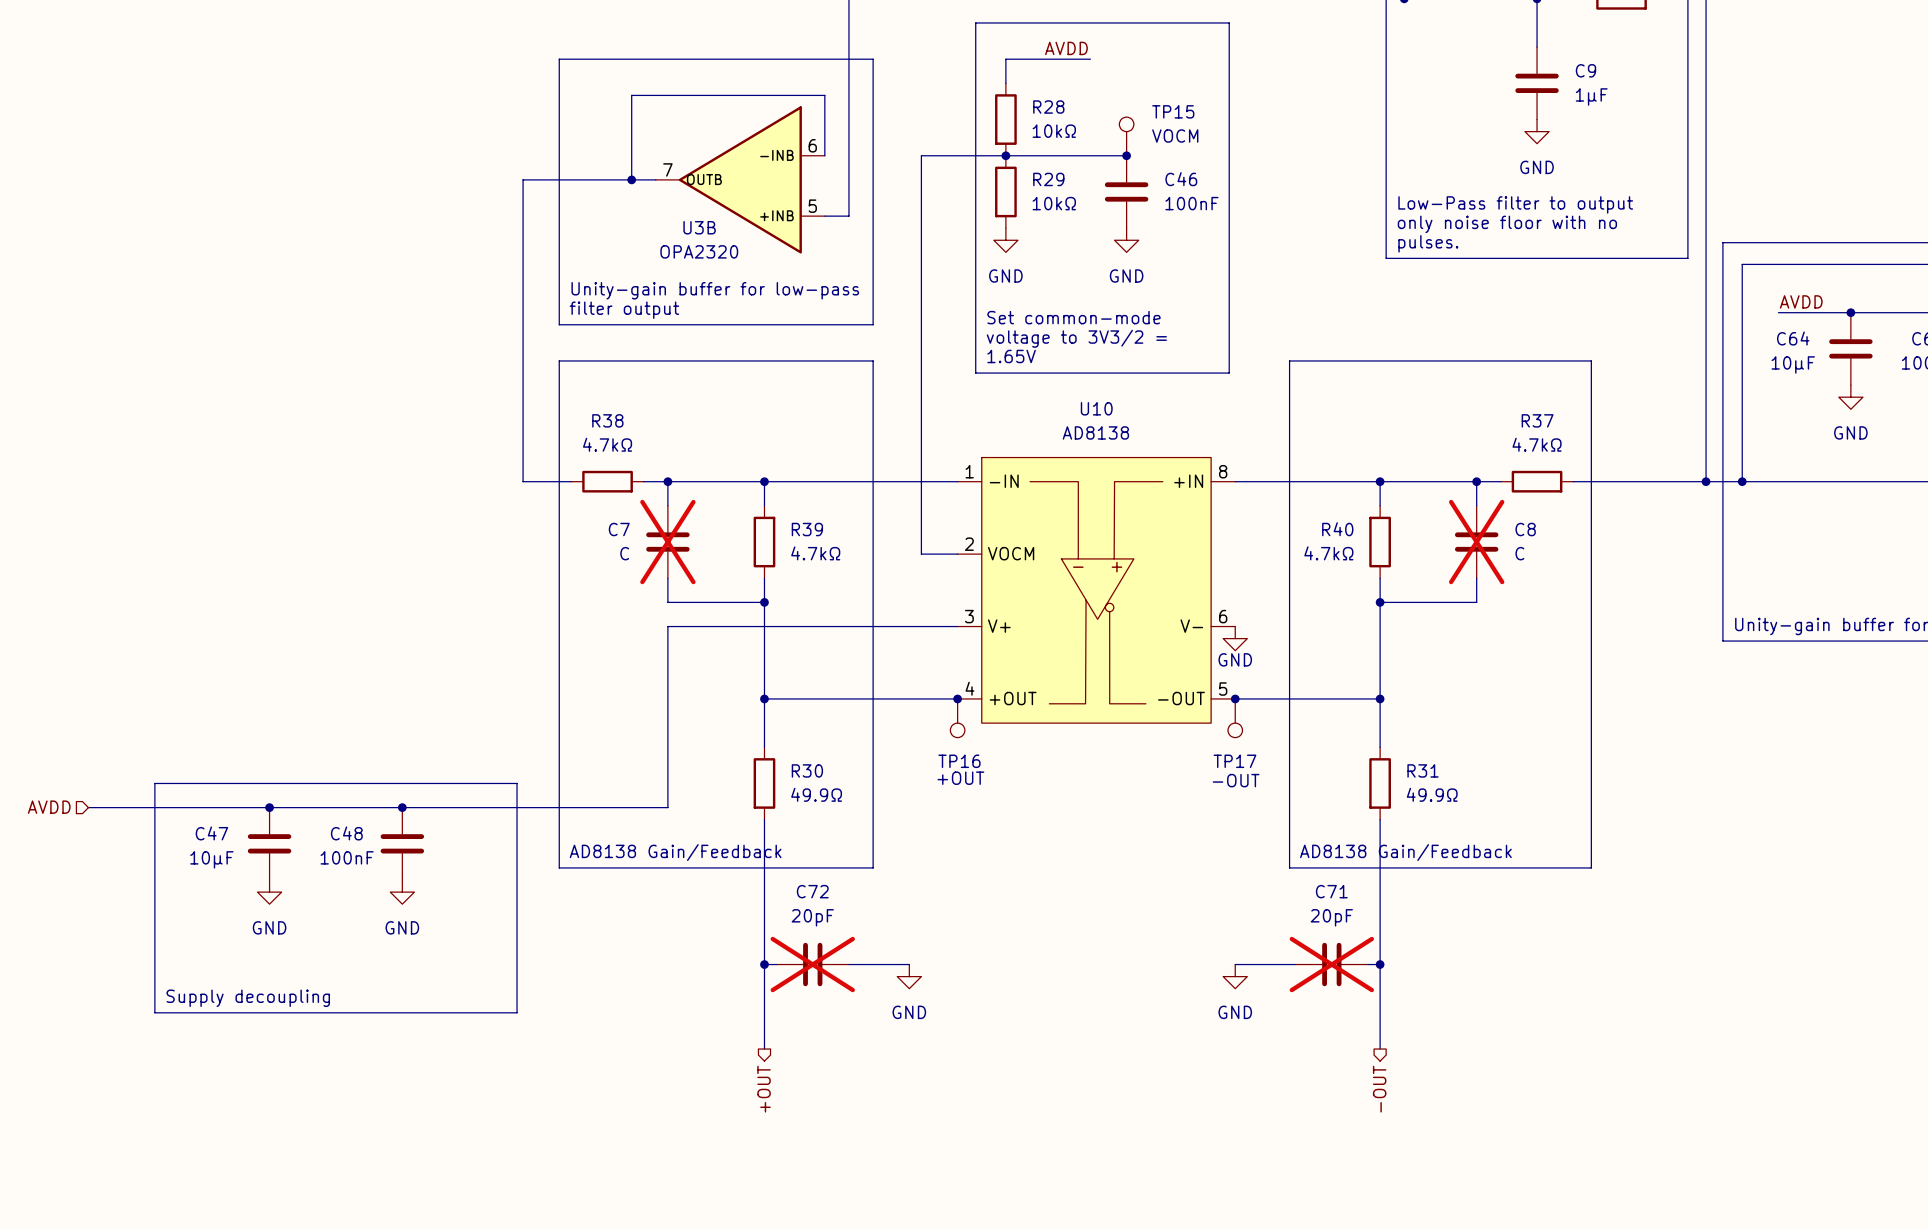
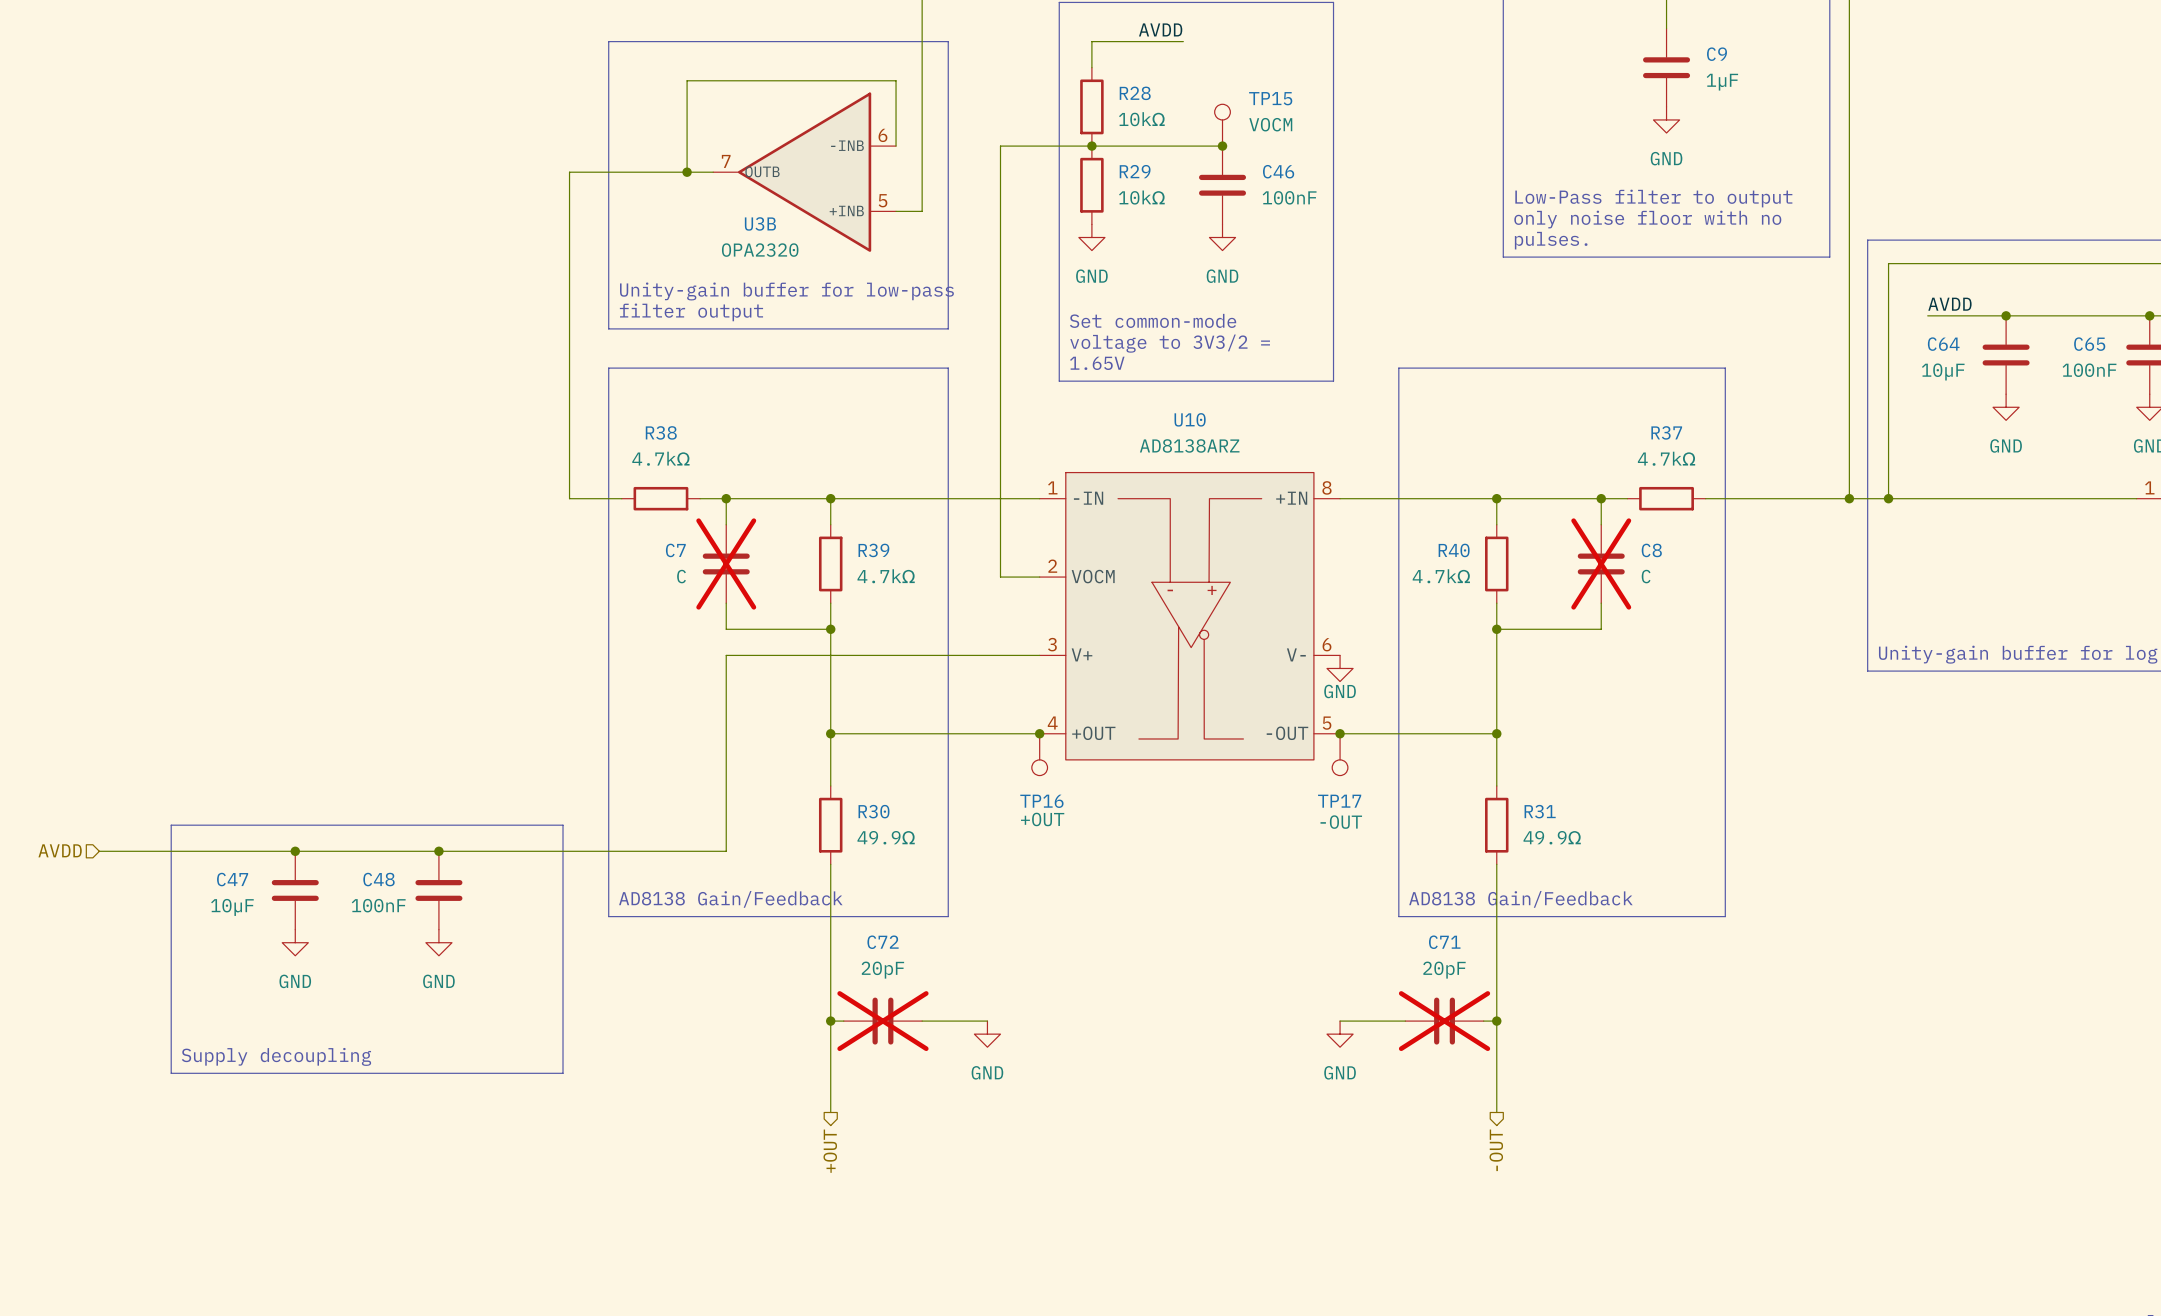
U10 value: AD8138 (1095, 432) -> AD8138ARZ (1189, 445)

